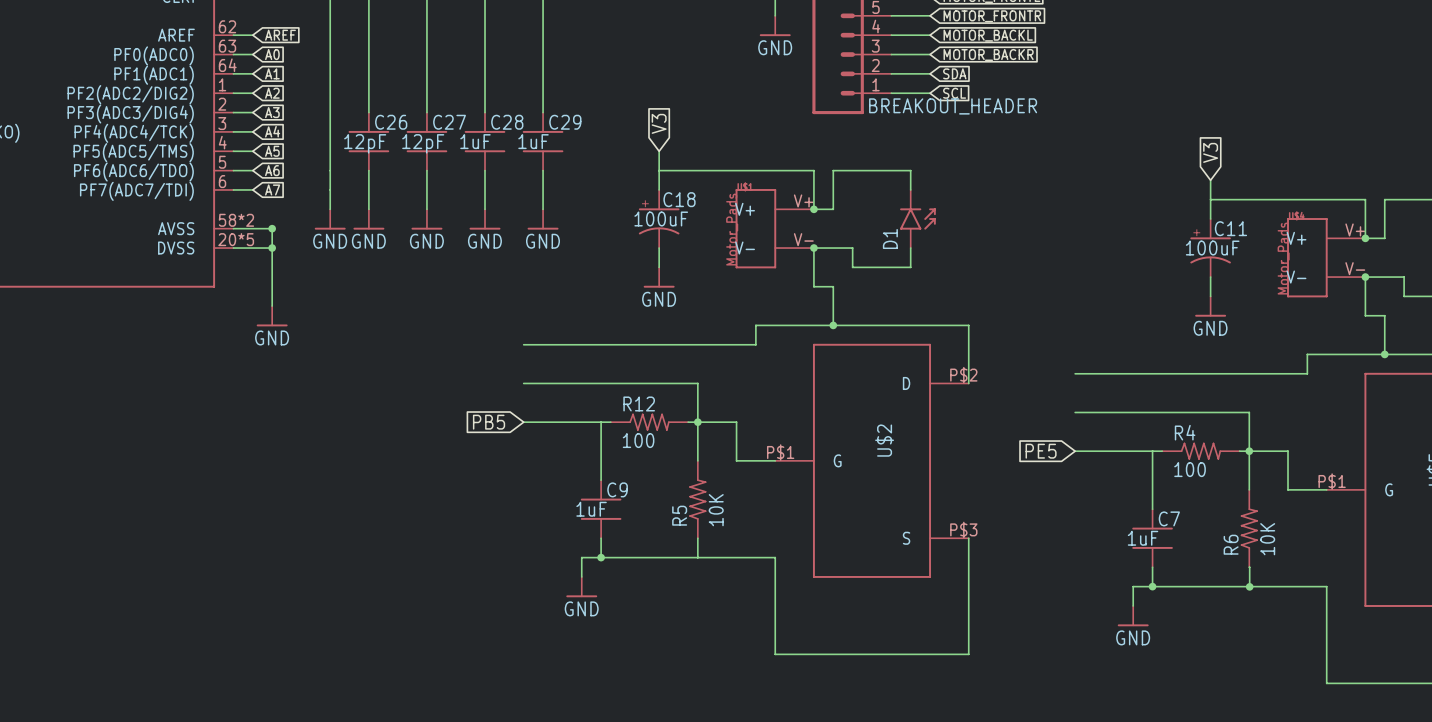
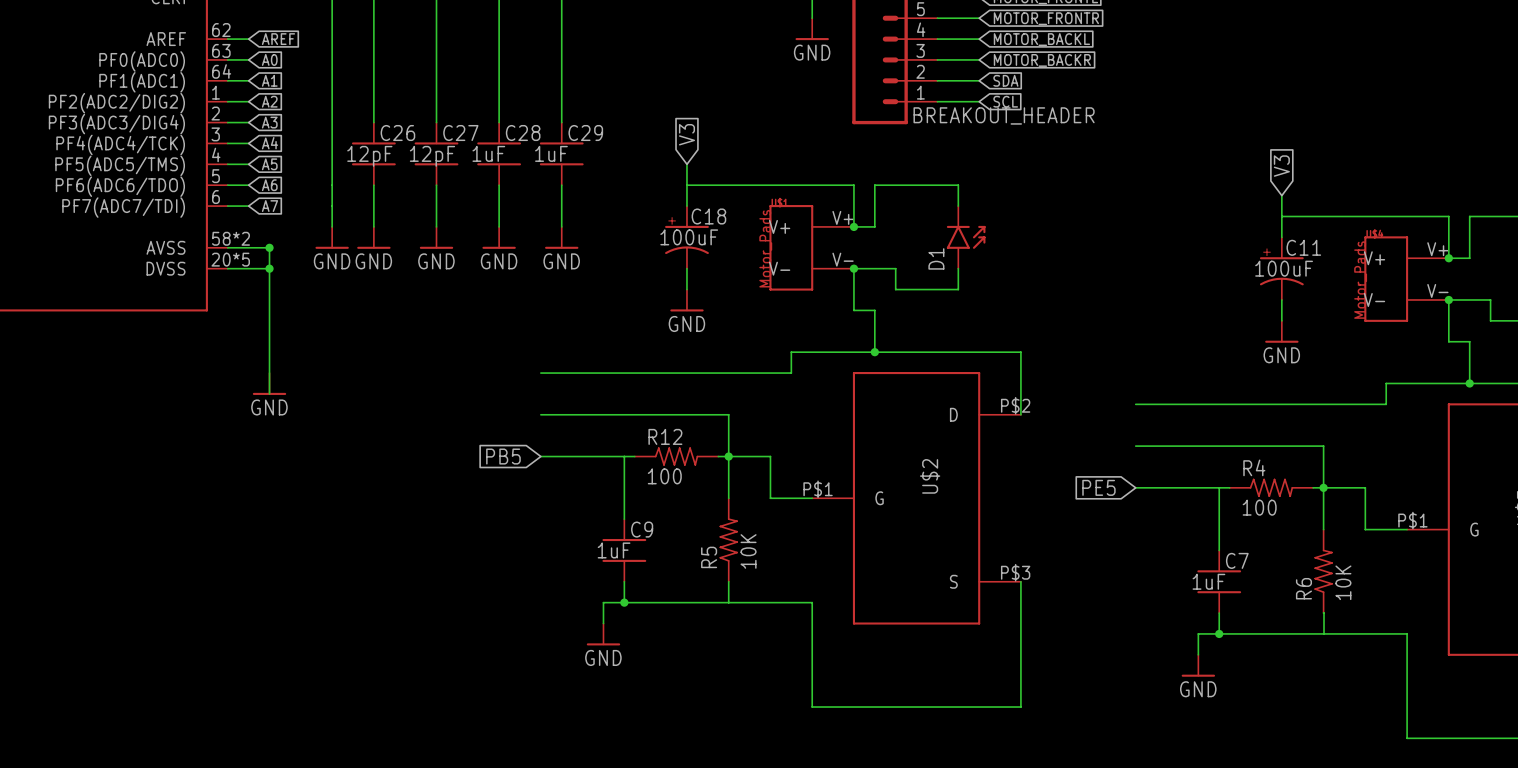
wire: none -> (269, 331) (269, 393)
power symbol position: GND (272, 316) -> GND (269, 384)
junction: (1249, 586) -> none

